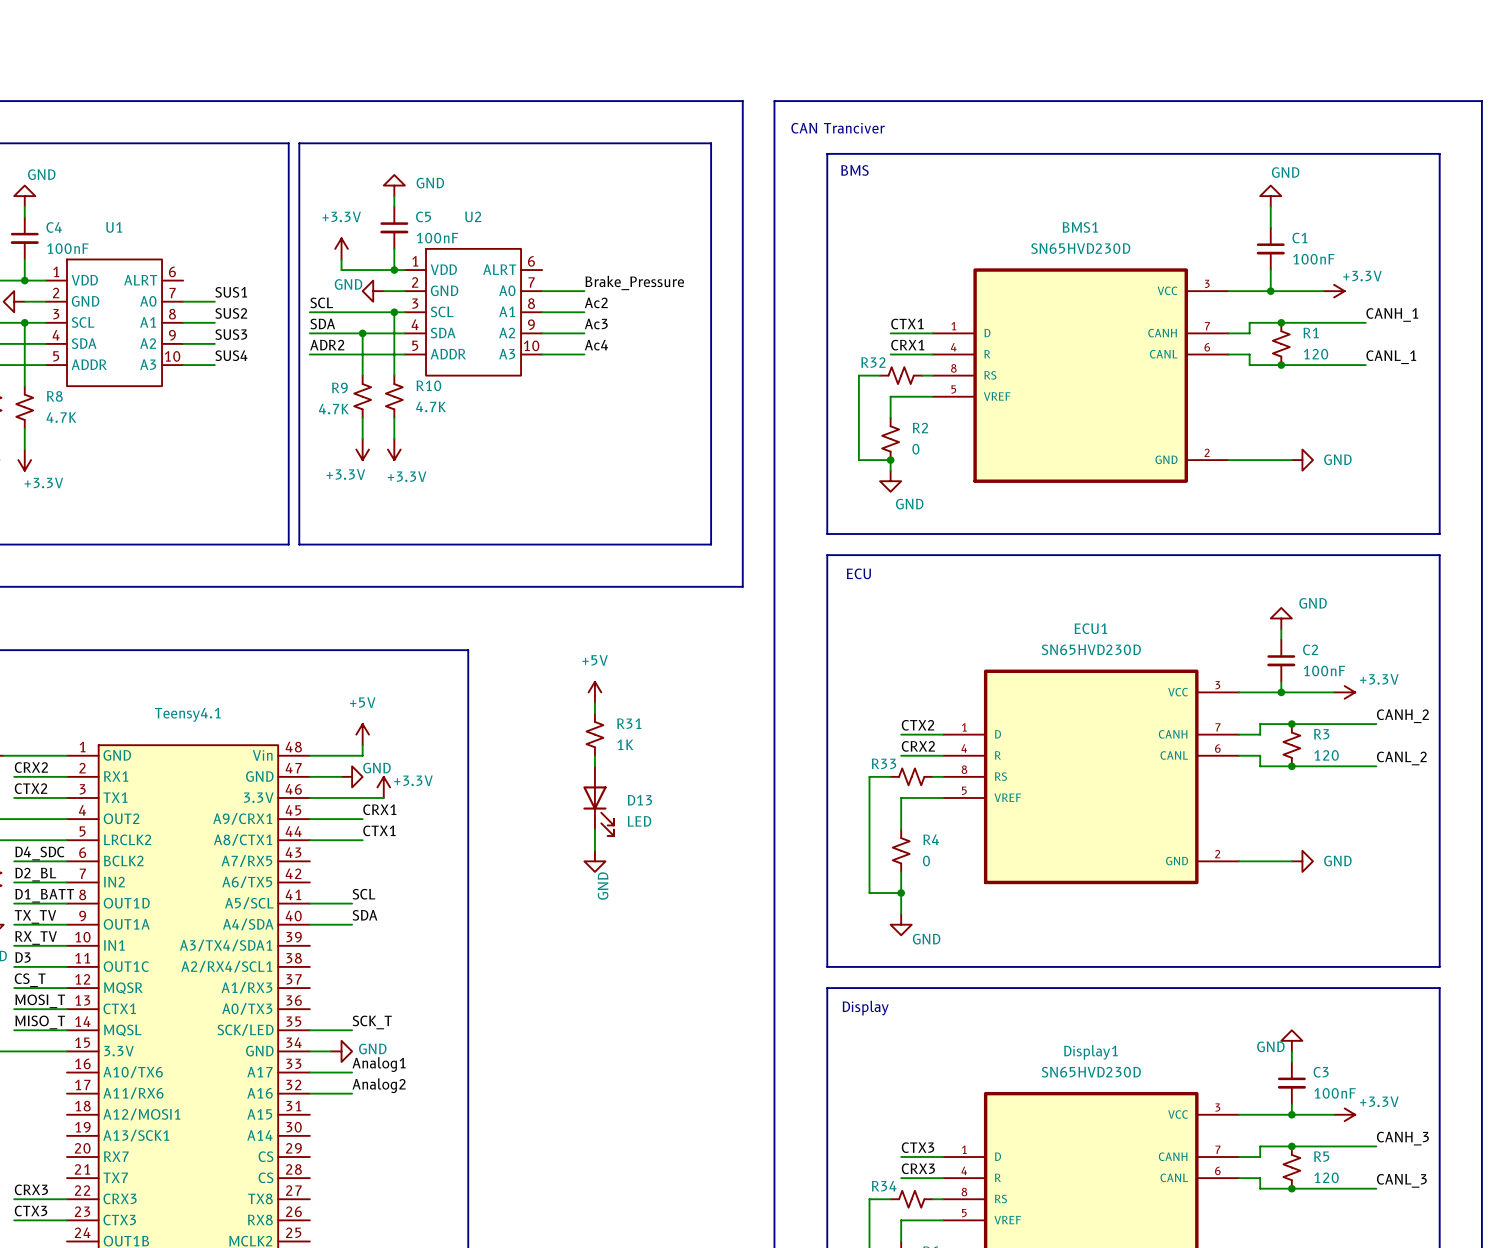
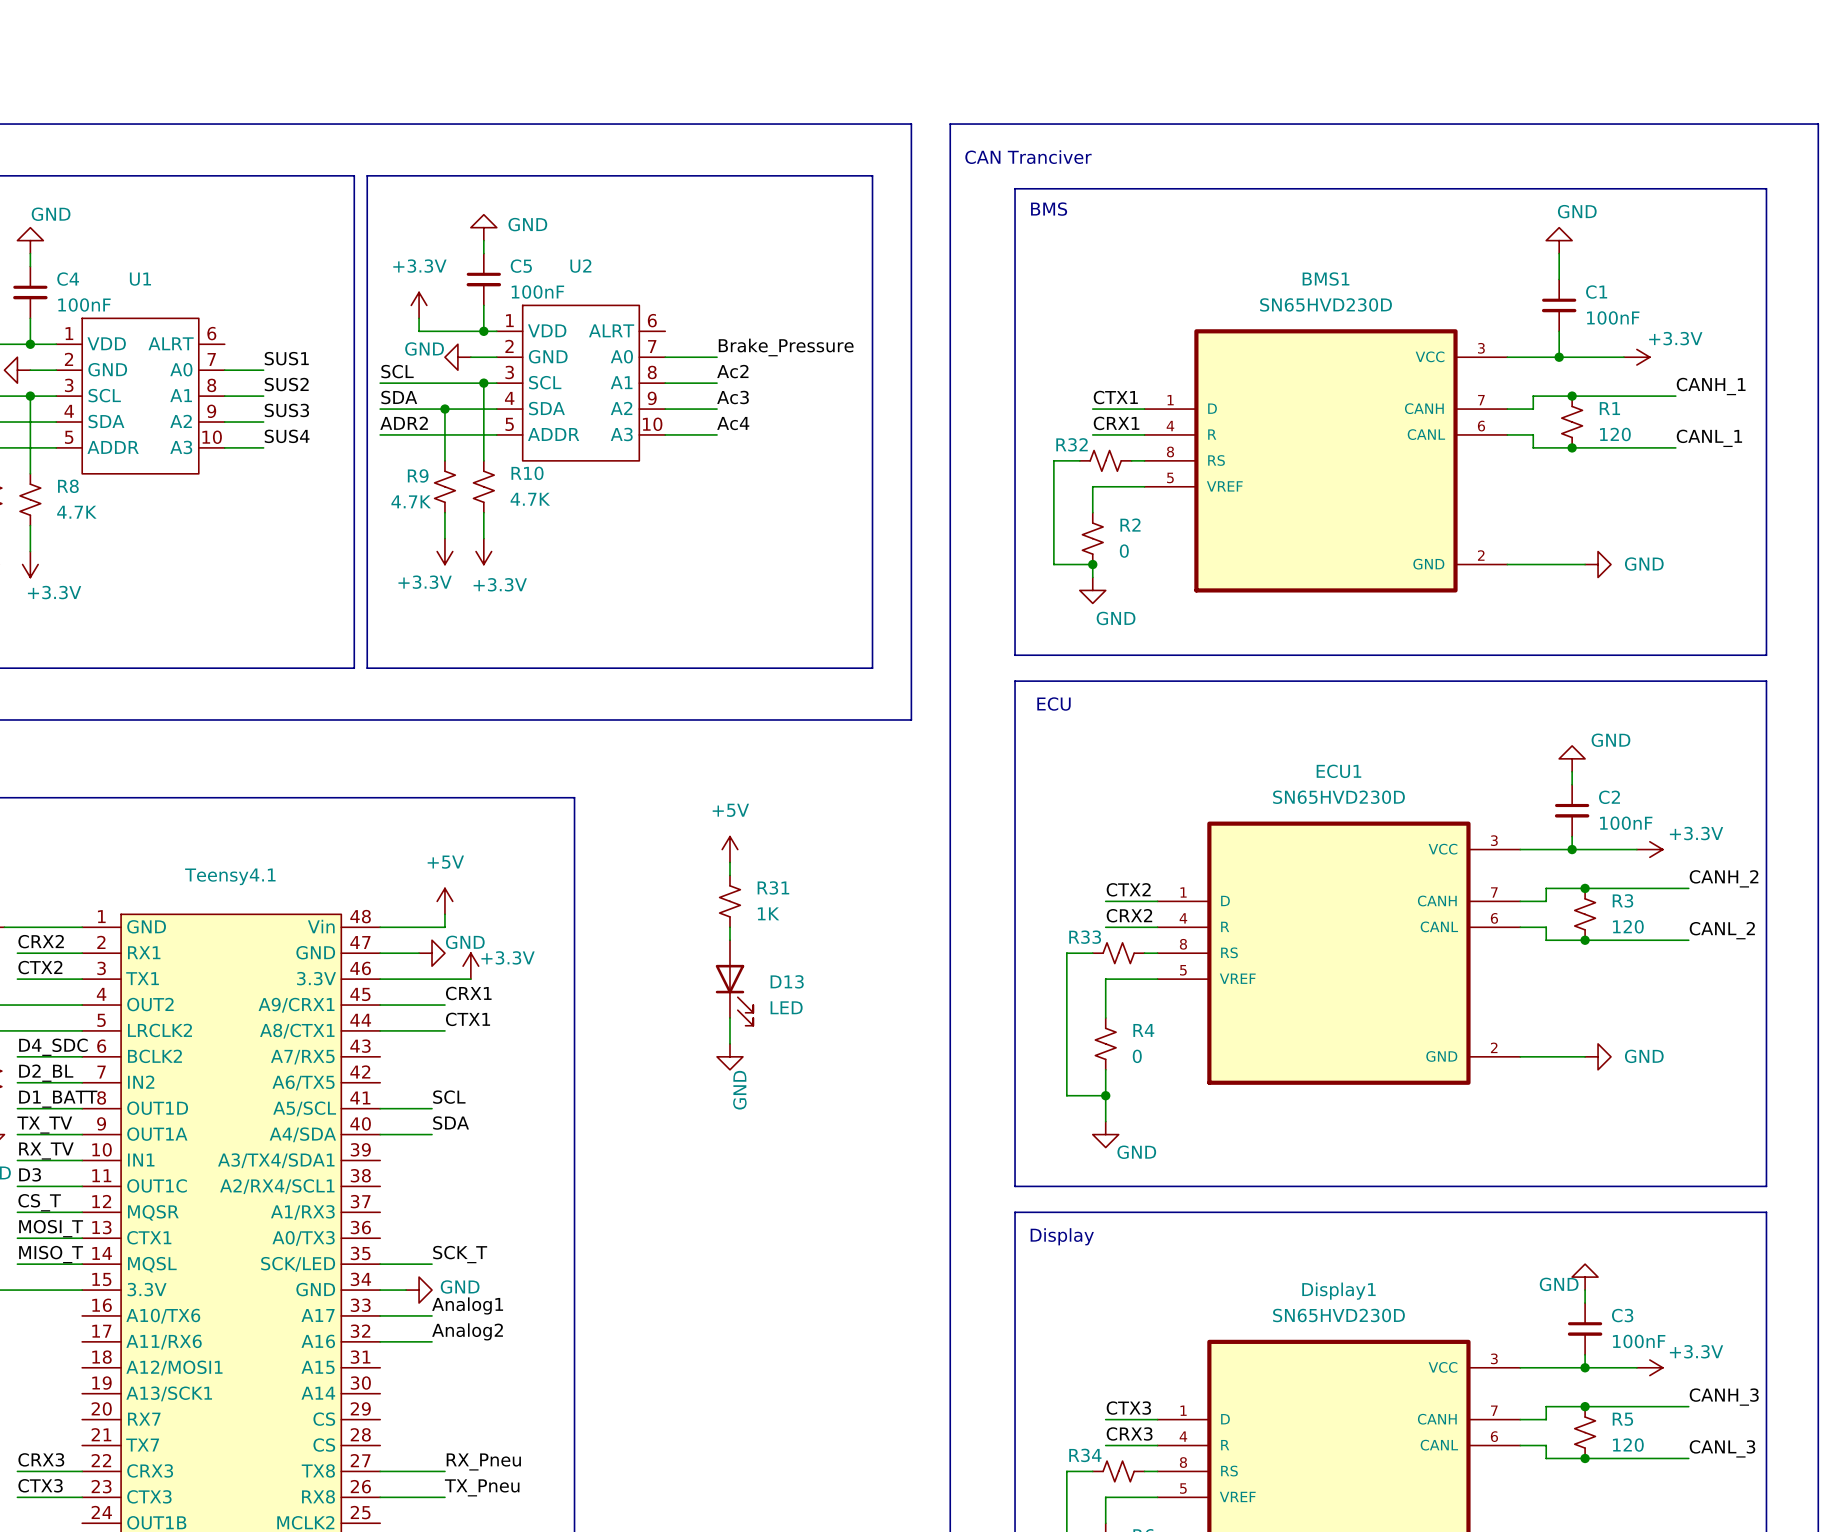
label: none -> RX_Pneu (483, 1461)
wire: none -> (380, 1471) (444, 1471)
label: none -> TX_Pneu (482, 1487)
wire: none -> (380, 1497) (444, 1497)

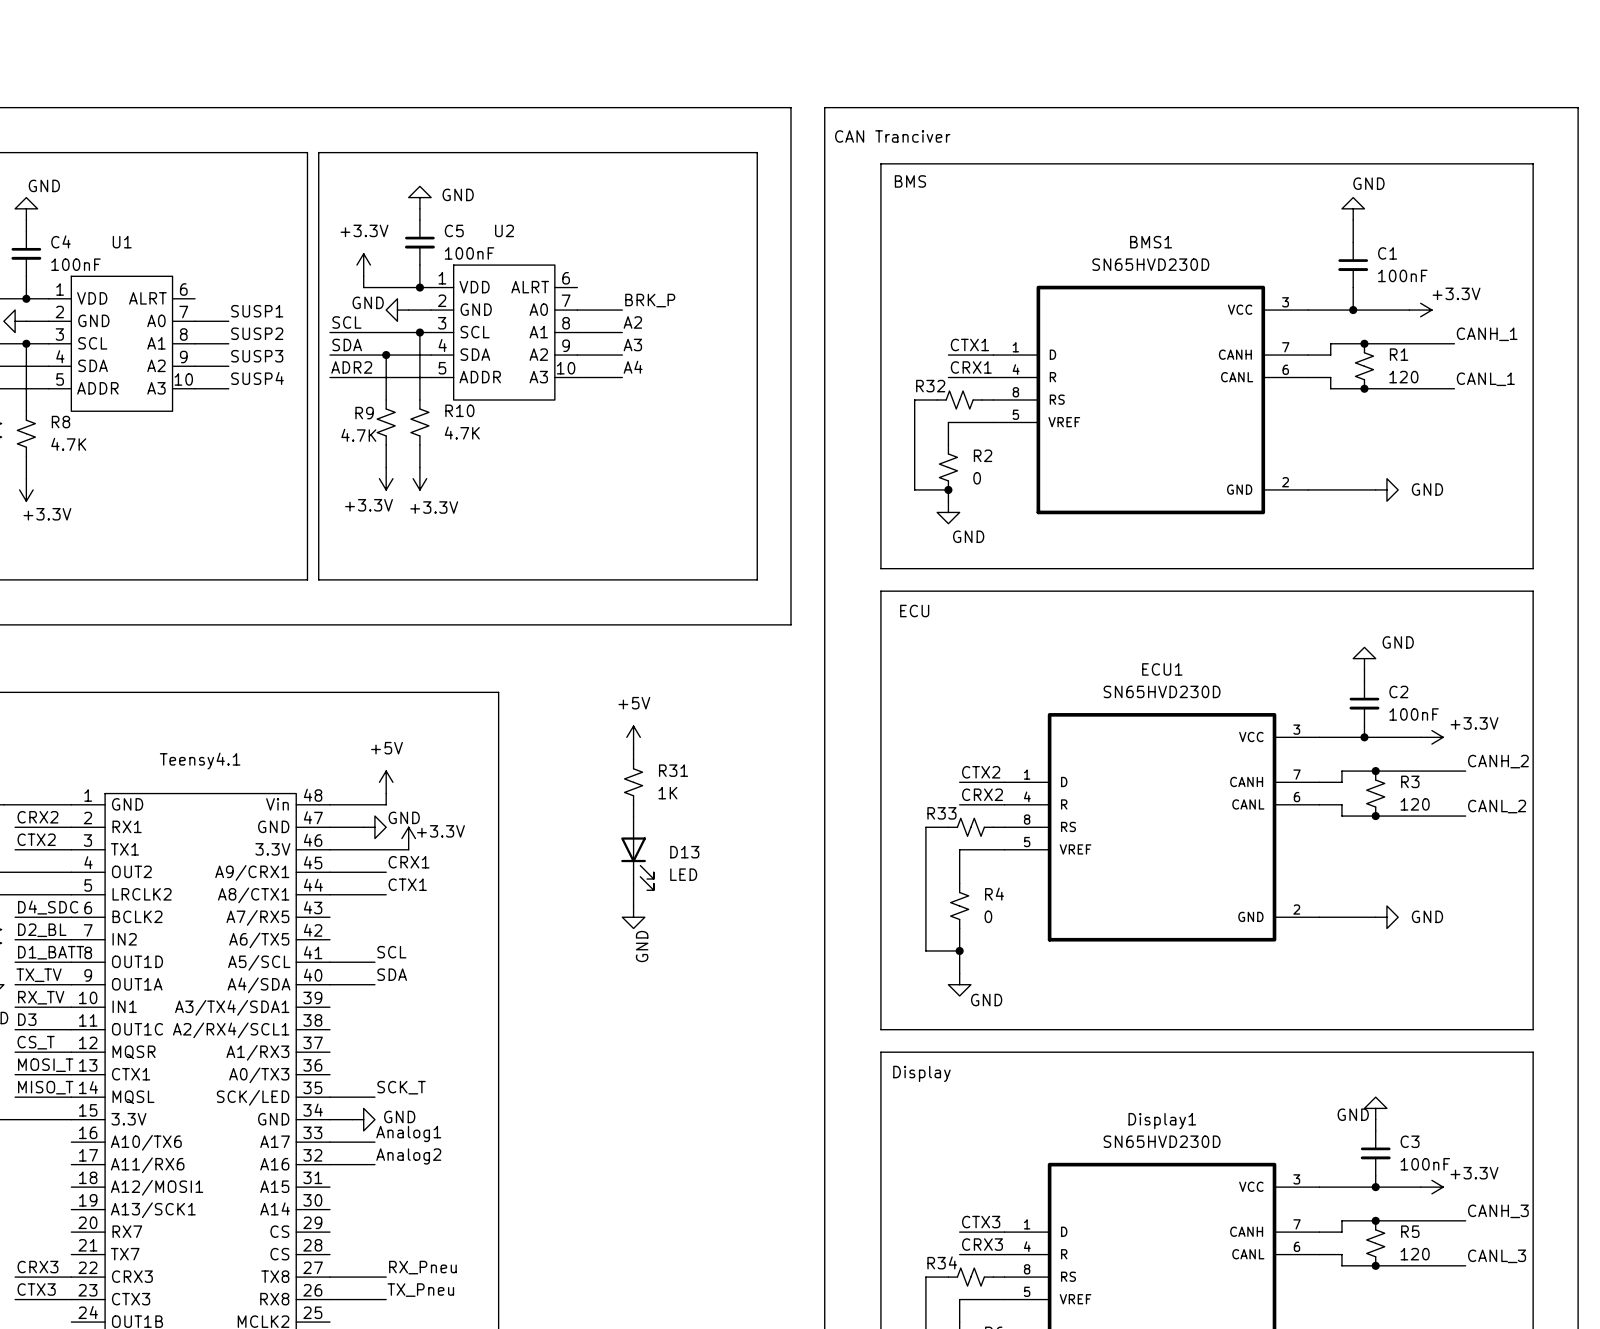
label: Brake_Pressure (786, 347) -> BRK_P (650, 300)
label: SUS1 (286, 358) -> SUSP1 (257, 311)
label: Ac2 (732, 371) -> A2 (632, 322)
label: SUS2 (286, 384) -> SUSP2 (257, 333)
label: Ac3 (733, 397) -> A3 (632, 344)
label: SUS3 (286, 410) -> SUSP3 (257, 356)
label: Ac4 (733, 423) -> A4 (633, 367)
label: SUS4 (287, 436) -> SUSP4 (257, 378)

